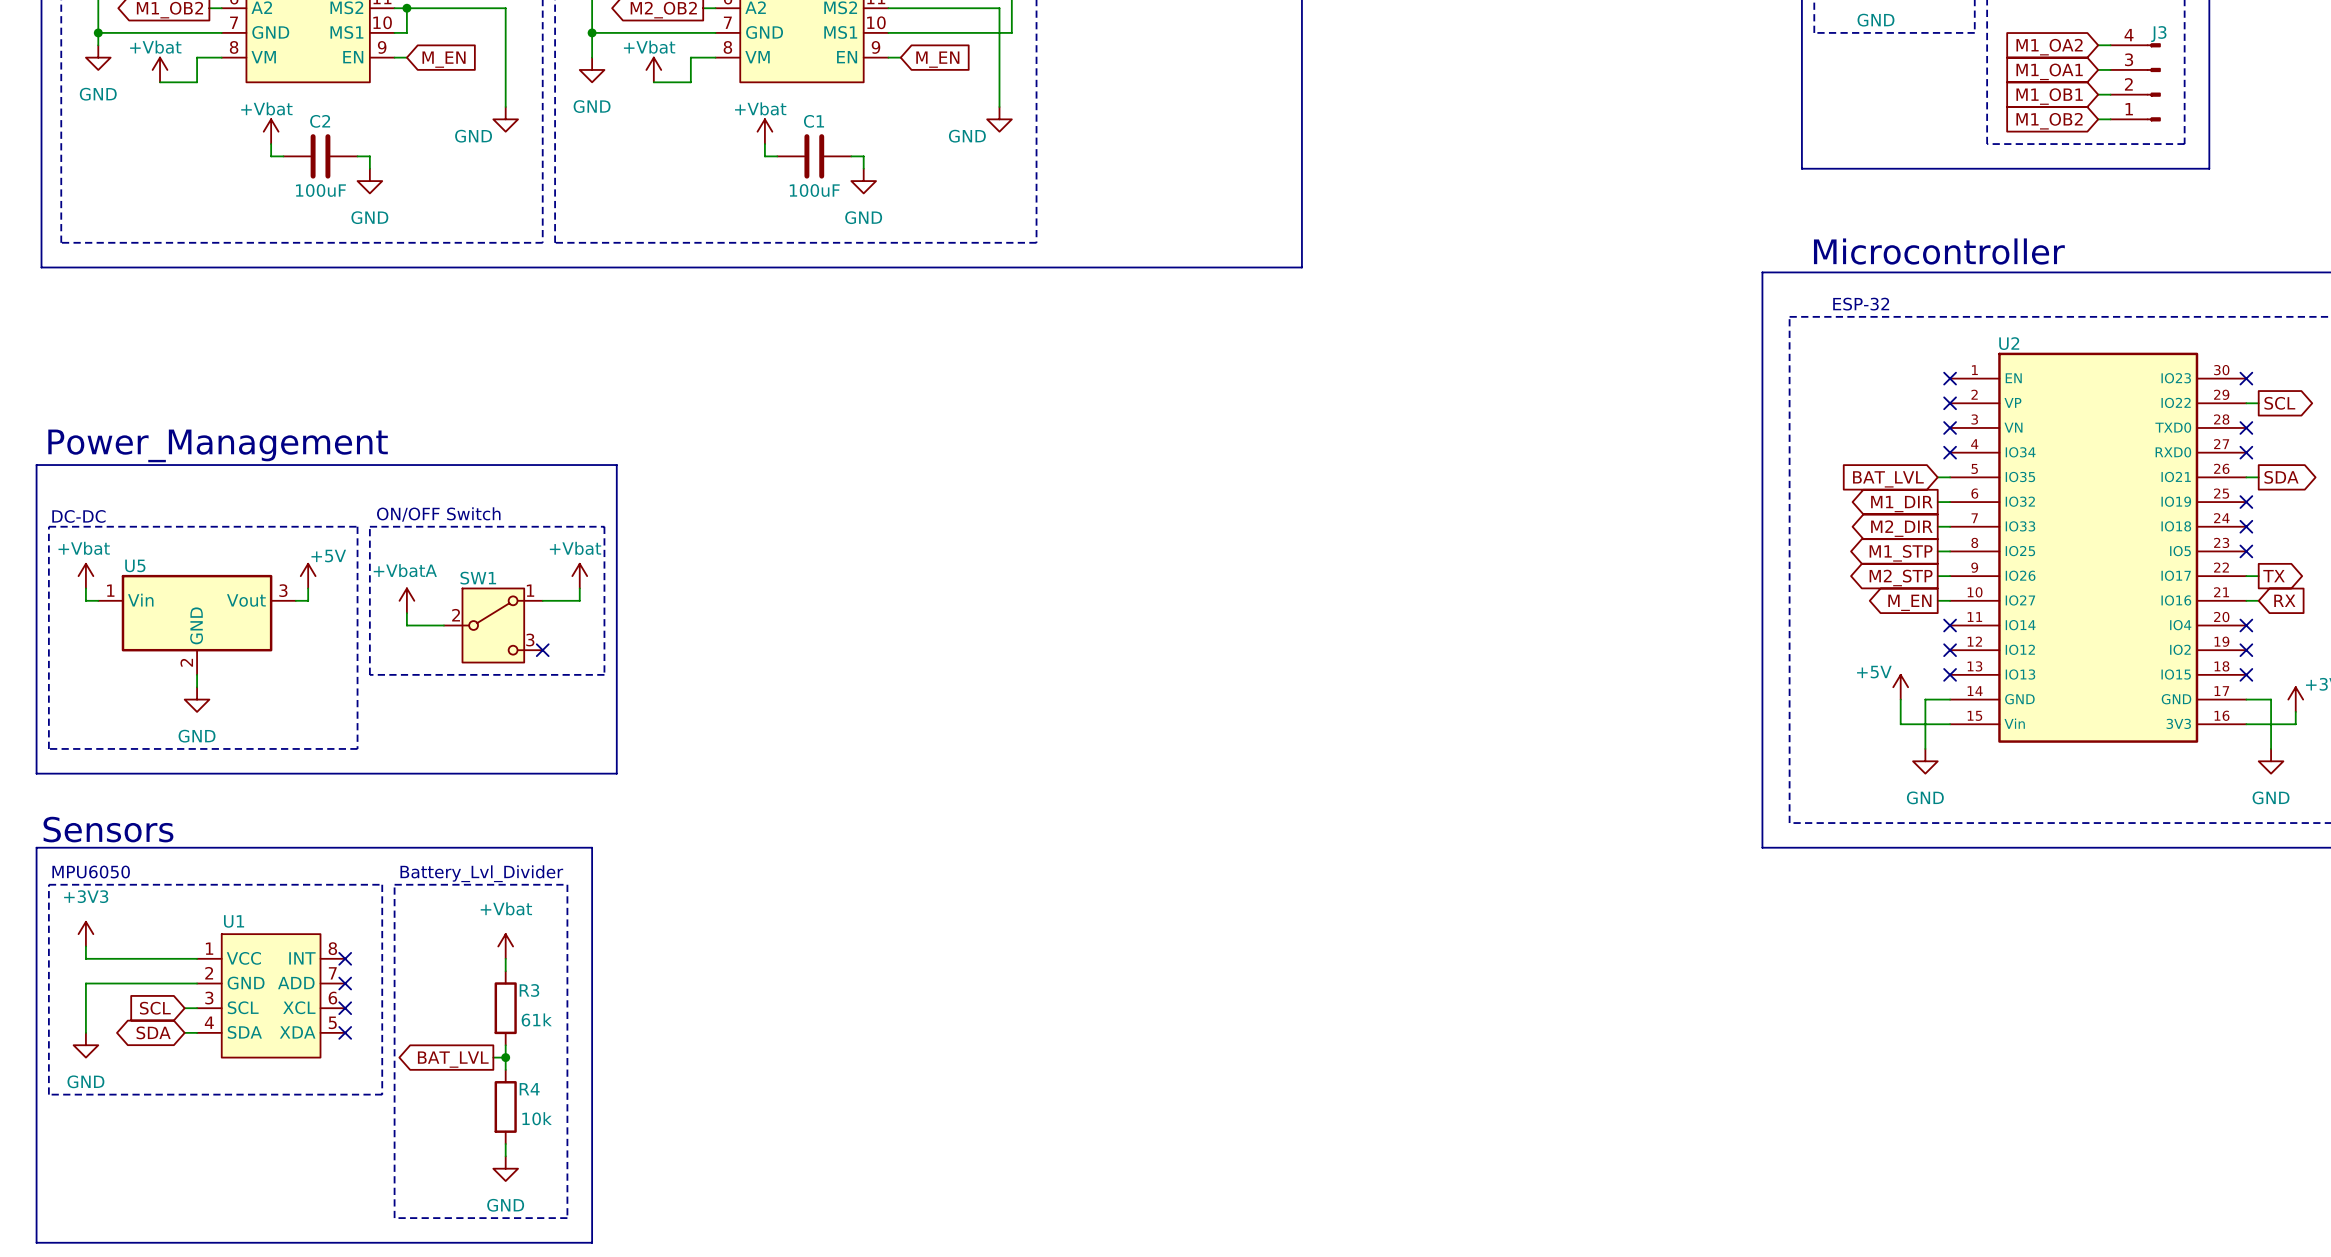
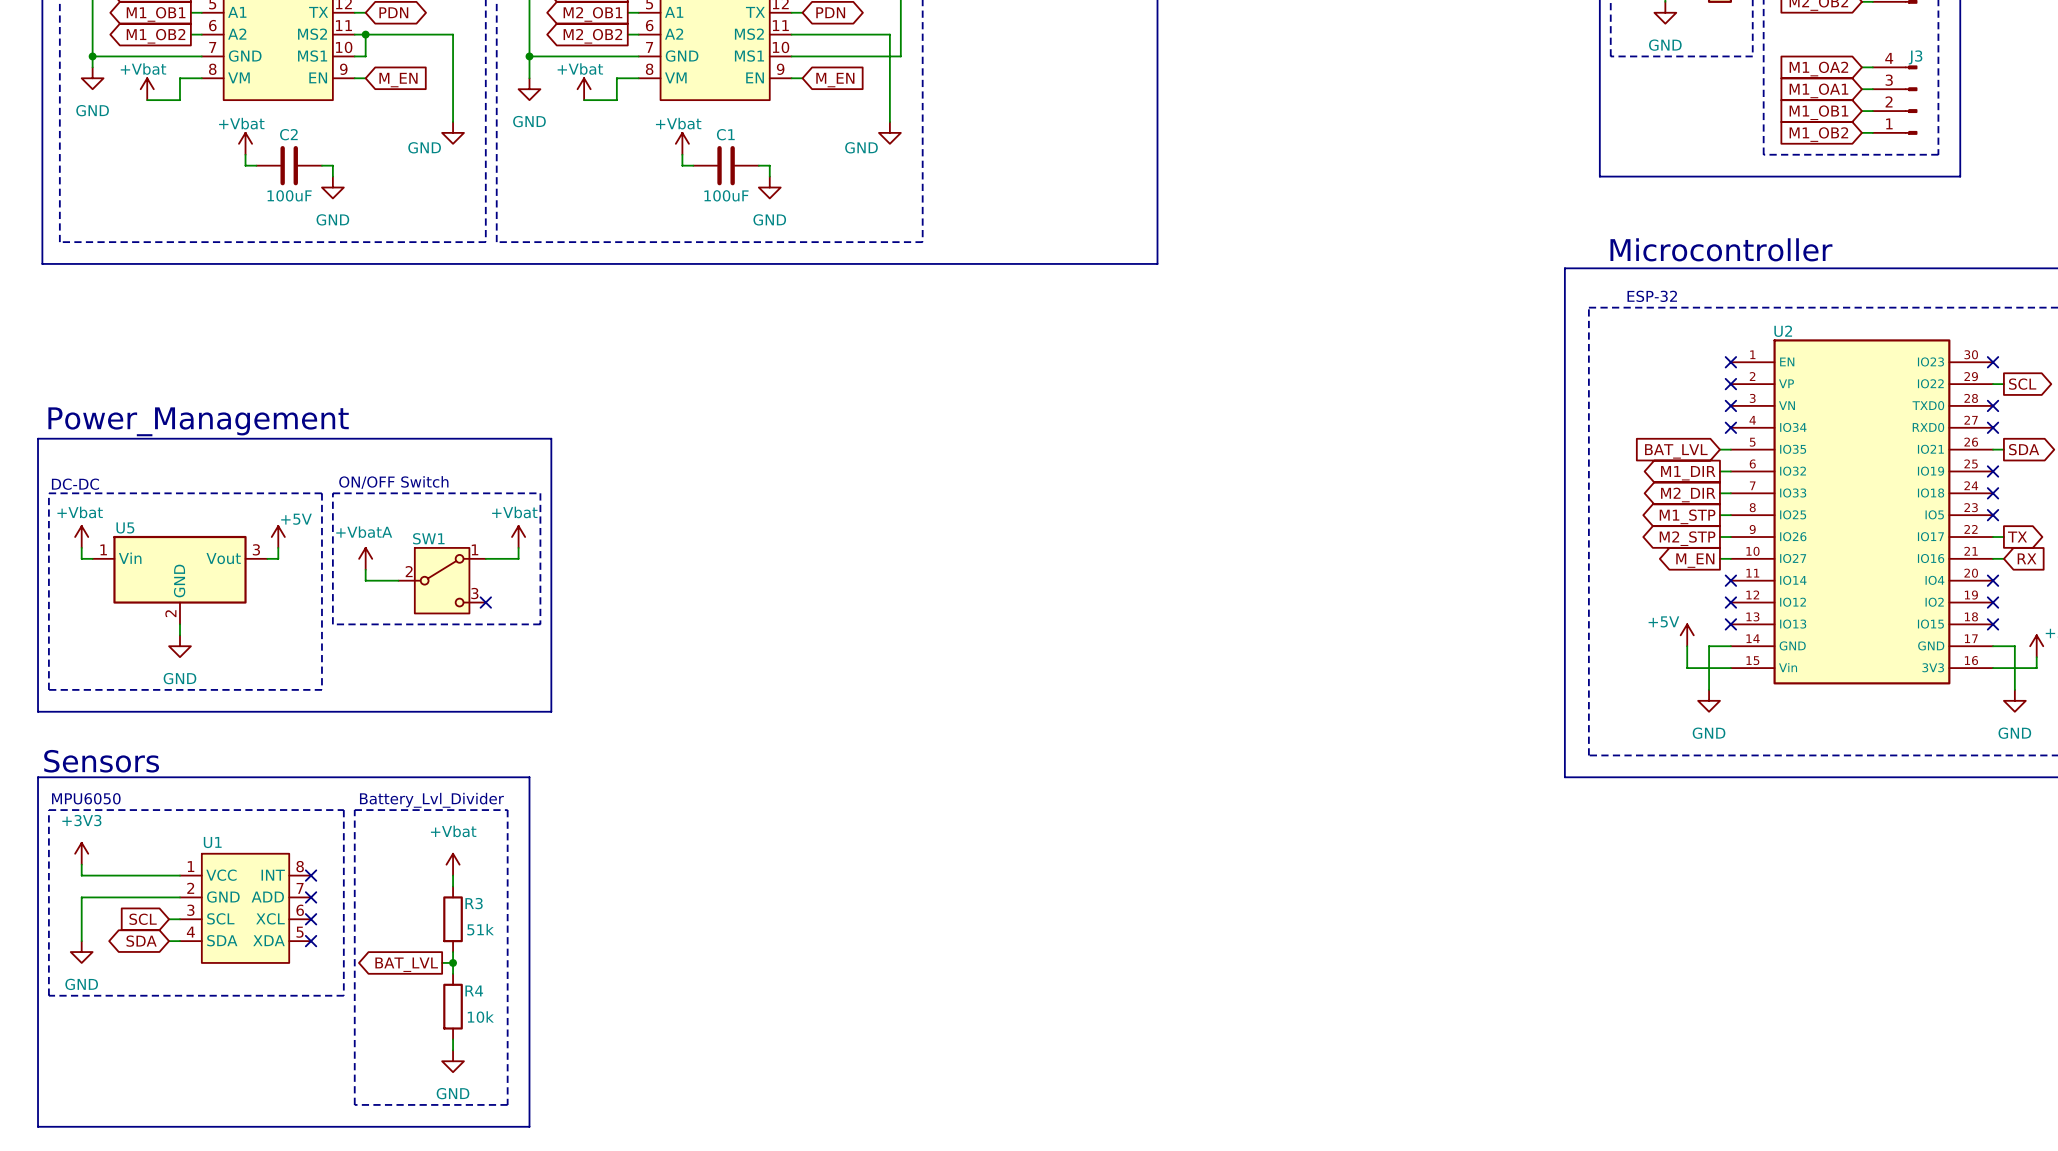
R3 value: 61k (536, 1019) -> 51k (480, 929)

